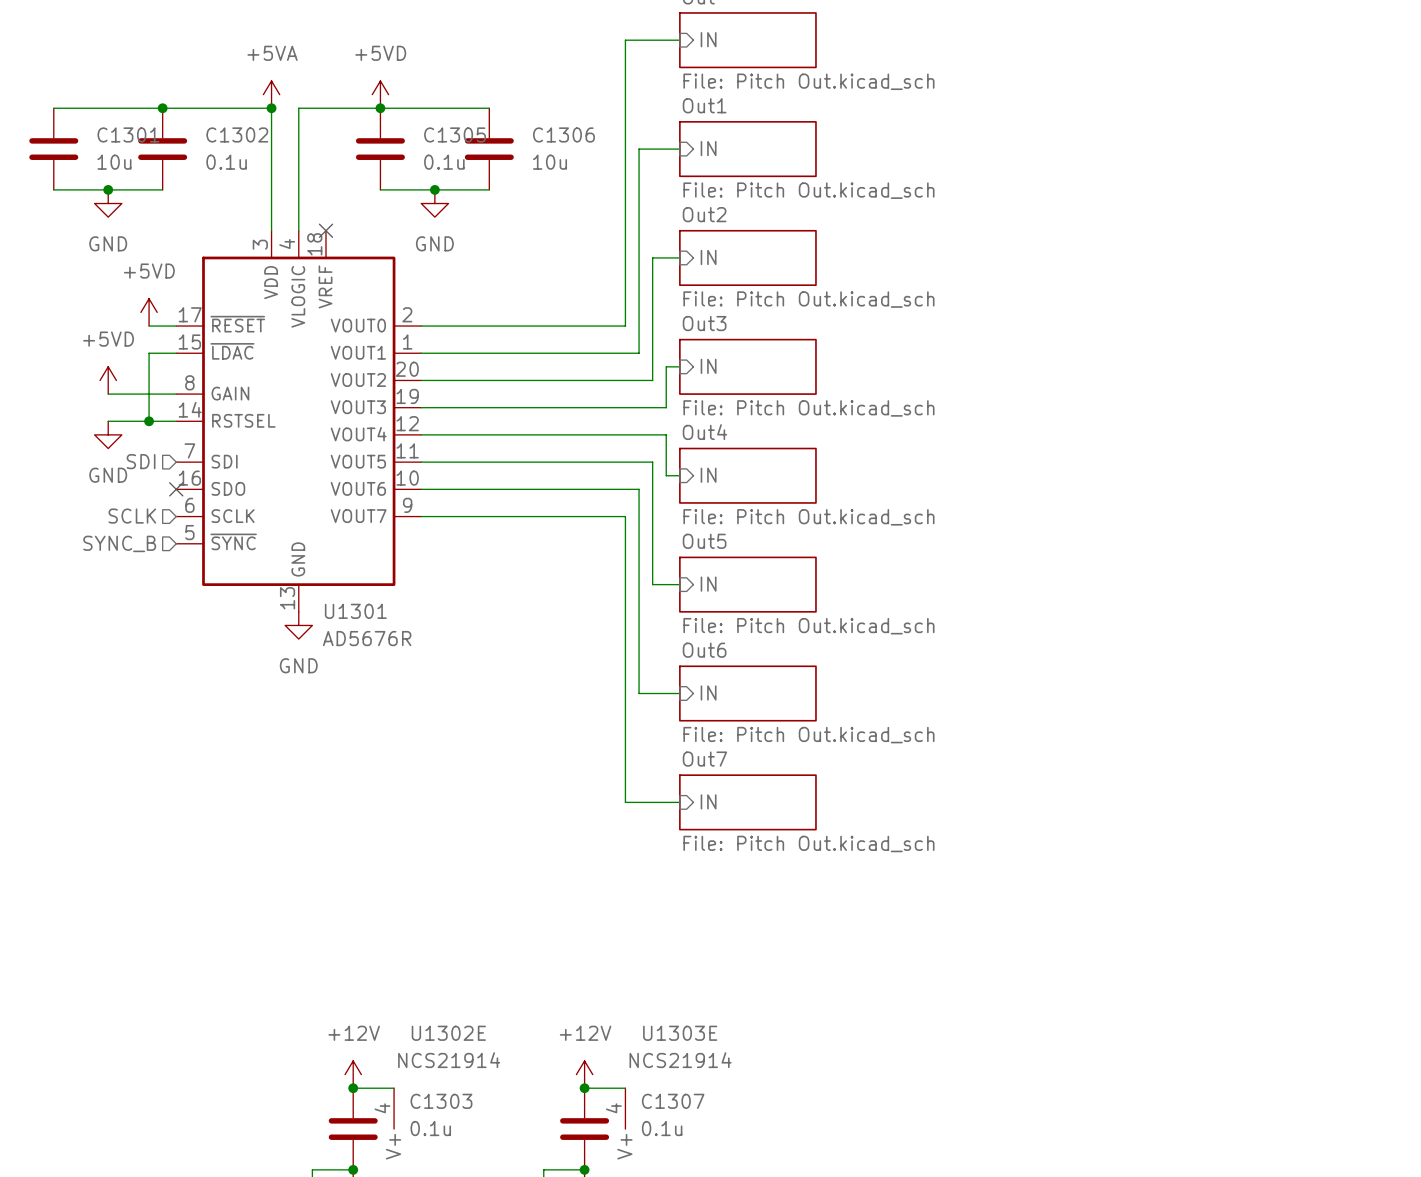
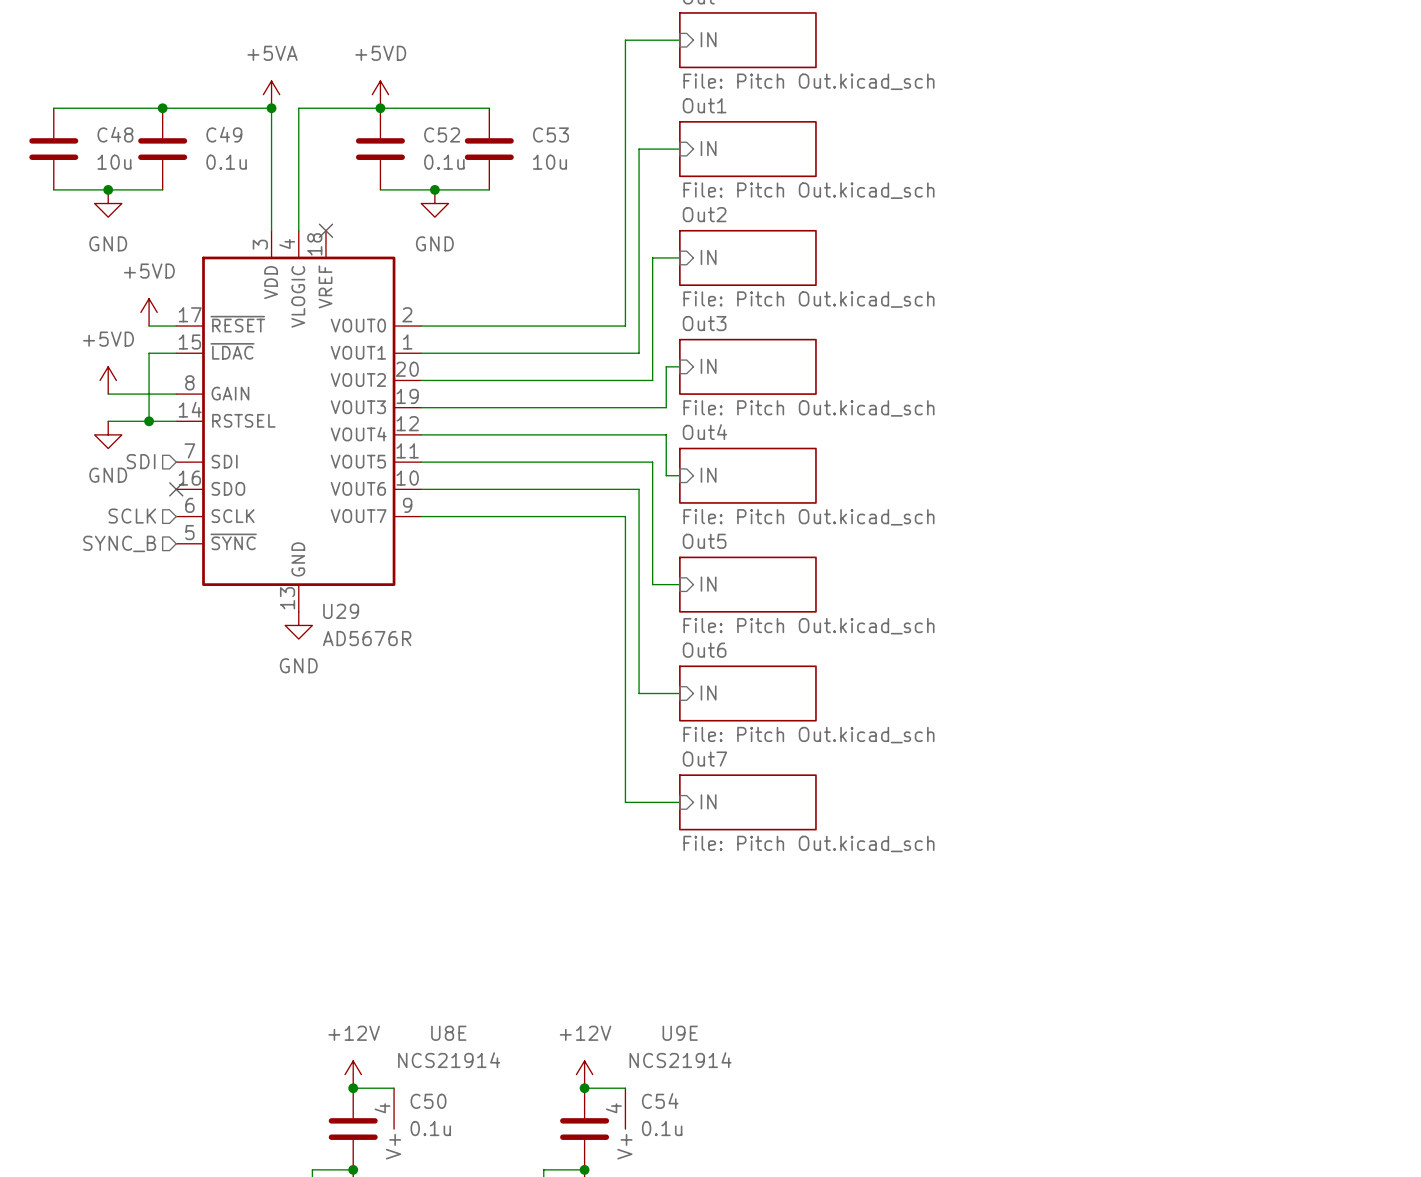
C1301 name: C1301 (128, 134) -> C48 (115, 134)
C1302 name: C1302 (237, 134) -> C49 (224, 134)
C1305 name: C1305 (455, 134) -> C52 (442, 134)
C1306 name: C1306 (563, 134) -> C53 (550, 134)
U1301 name: U1301 (355, 611) -> U29 (341, 611)
U1302E name: U1302E (448, 1033) -> U8E (448, 1033)
U1303E name: U1303E (680, 1033) -> U9E (680, 1033)
C1303 name: C1303 (441, 1101) -> C50 (428, 1101)
C1307 name: C1307 (673, 1101) -> C54 (660, 1100)

